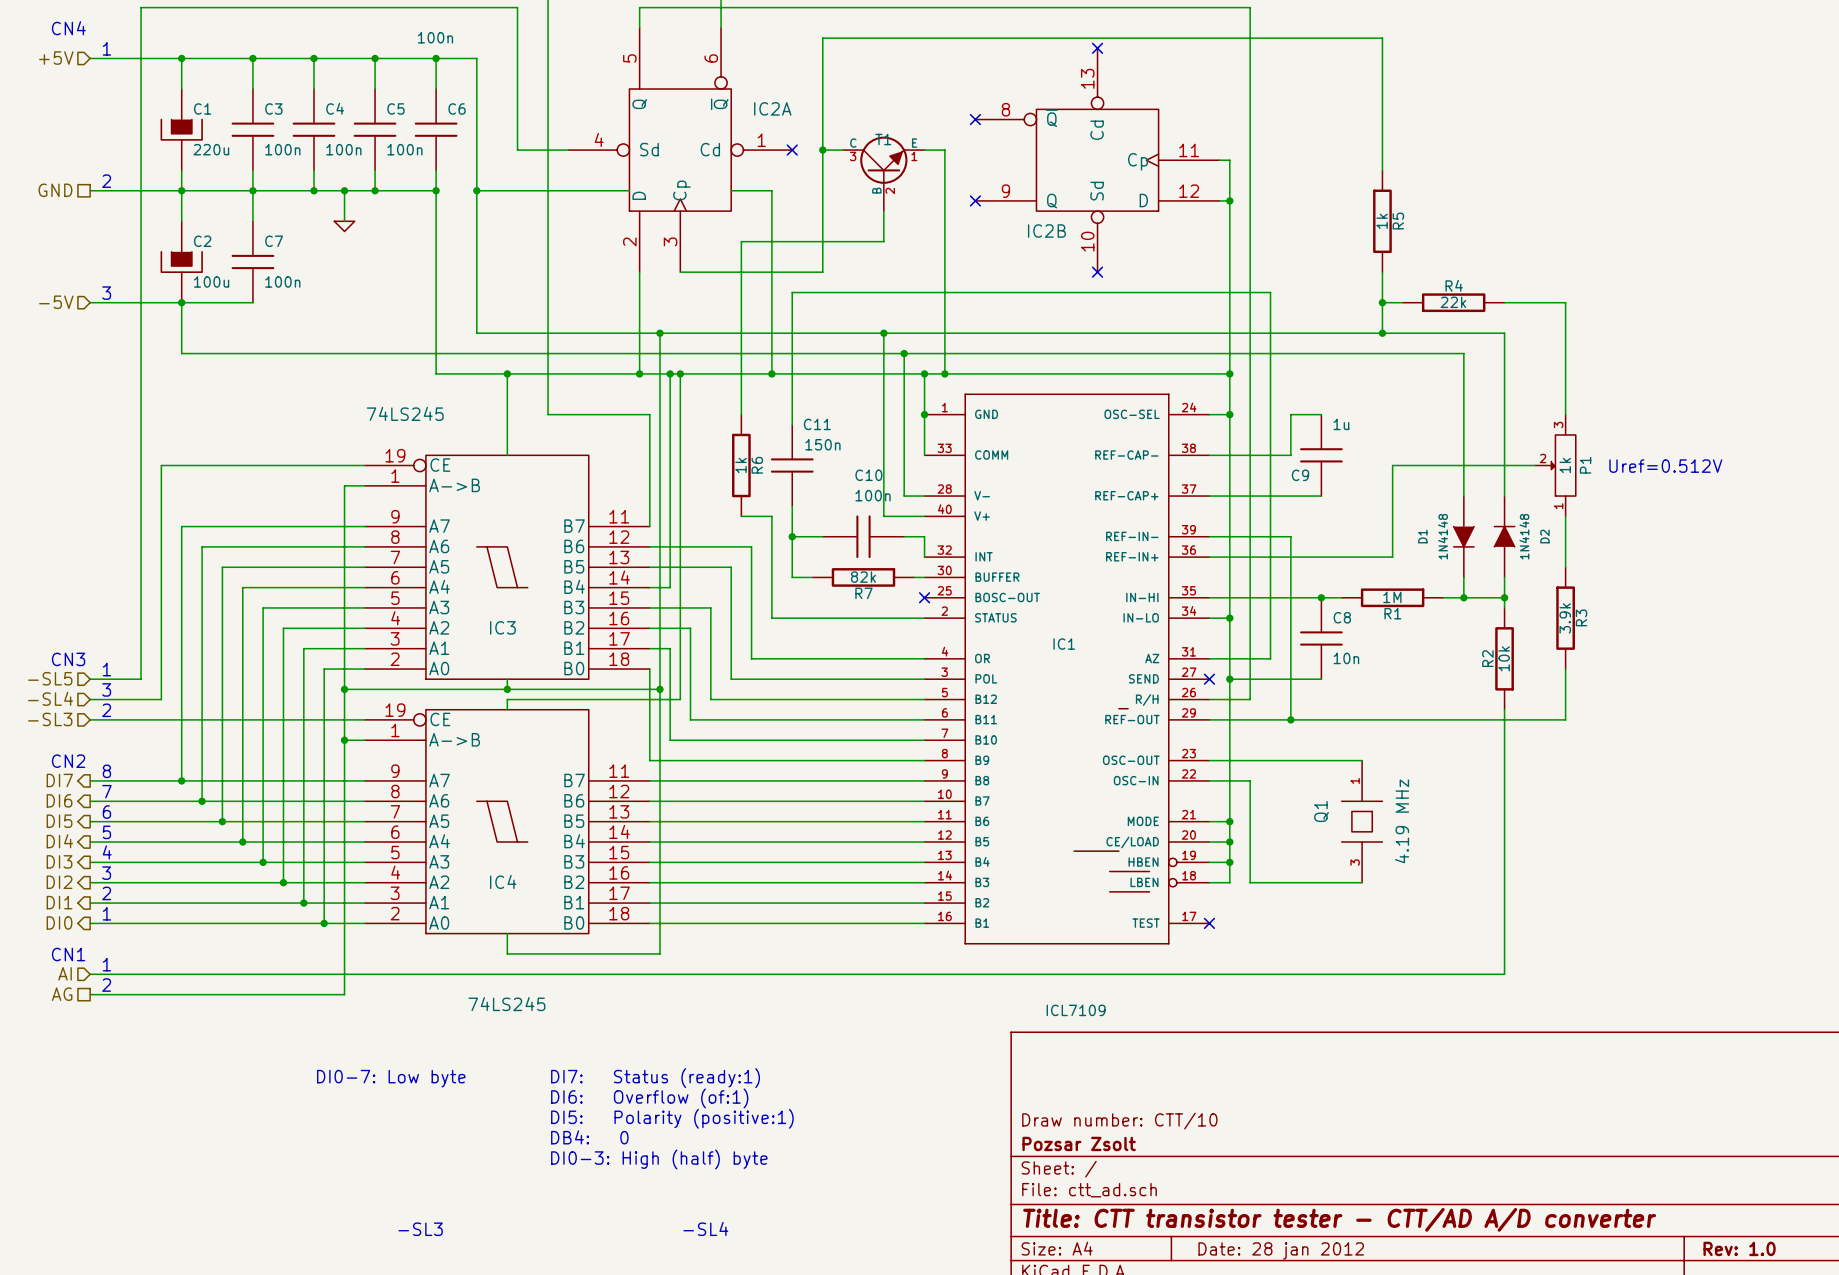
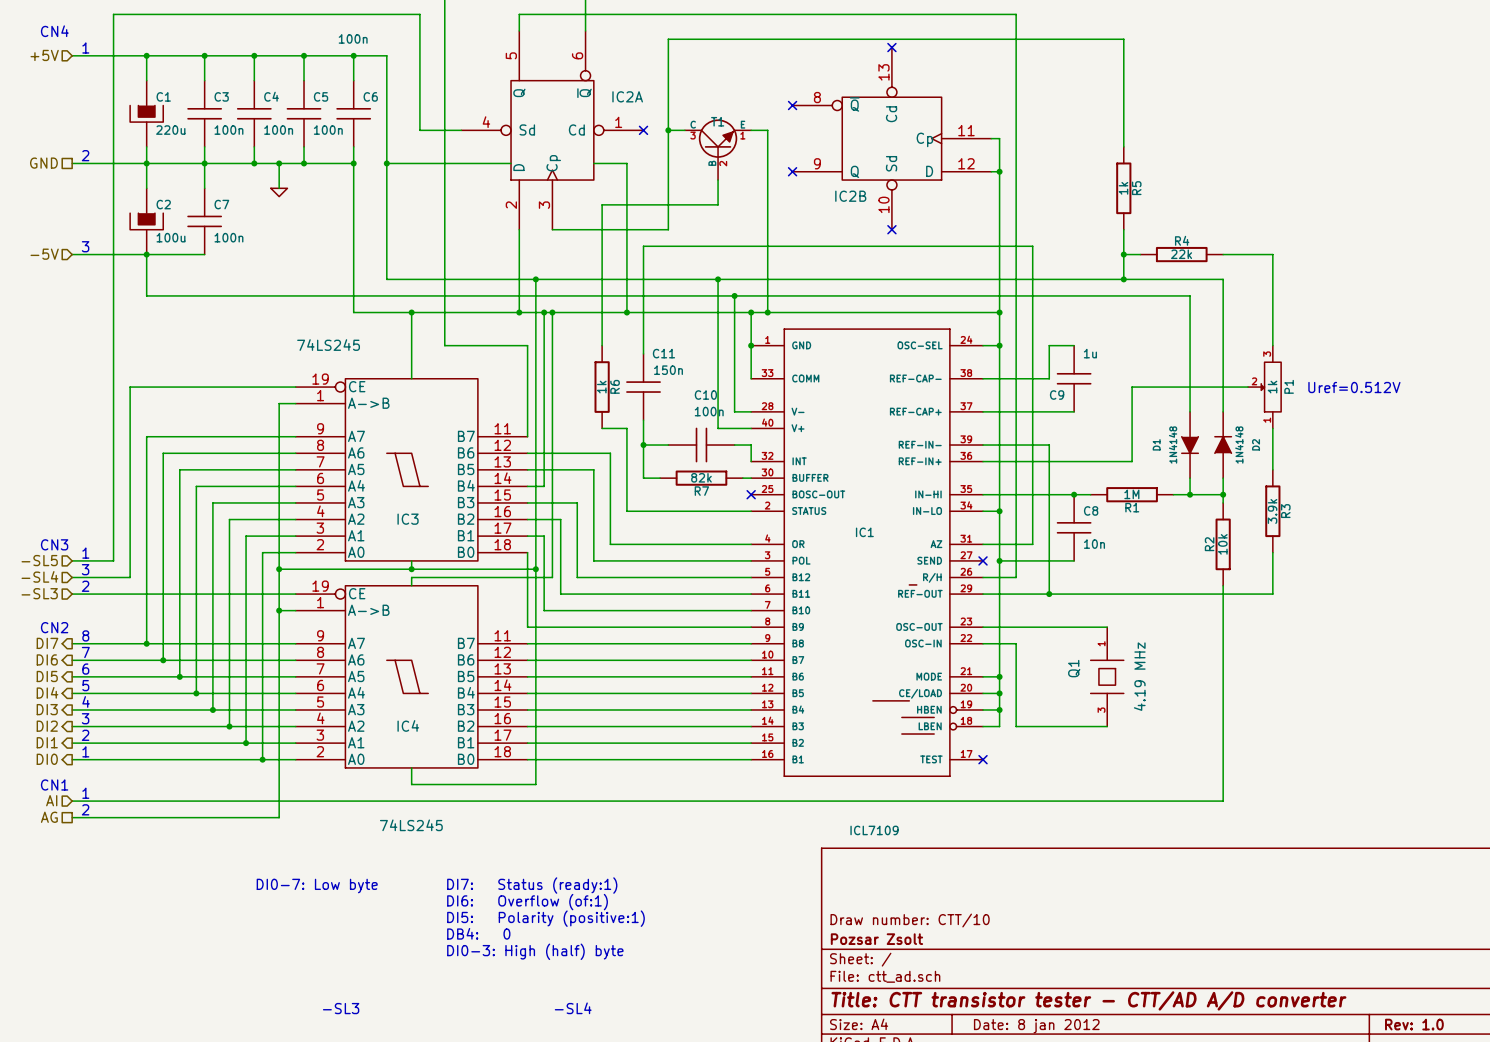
title block: Date: 28 jan 2012 (1281, 1250) -> Date: 8 jan 2012 (1036, 1026)

